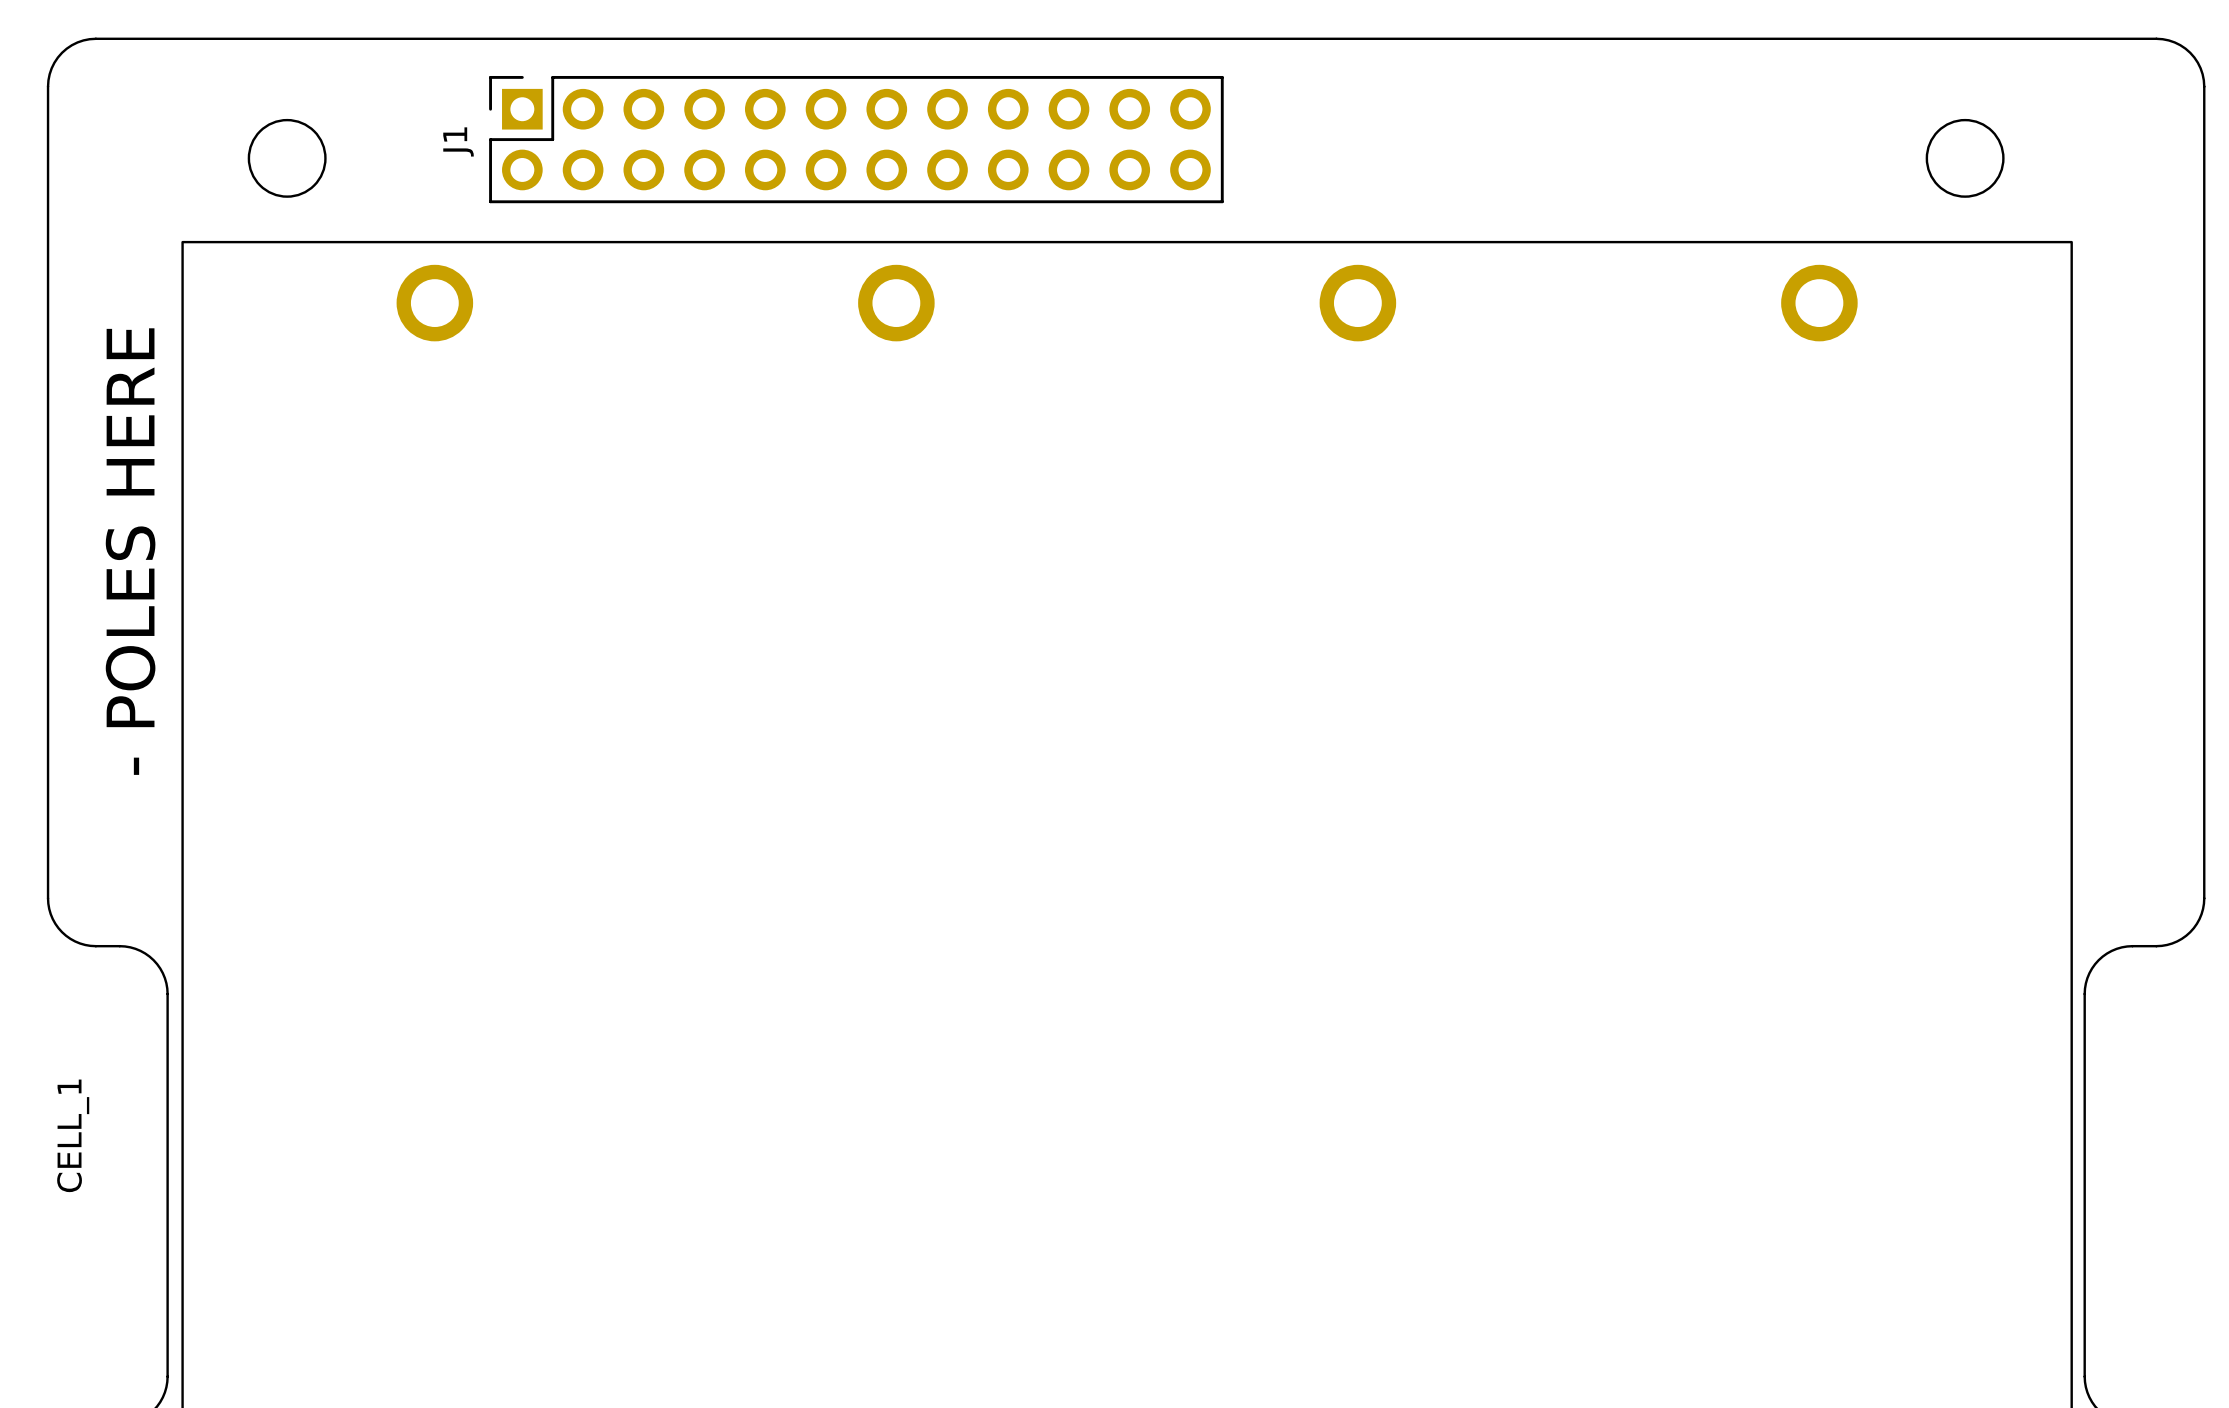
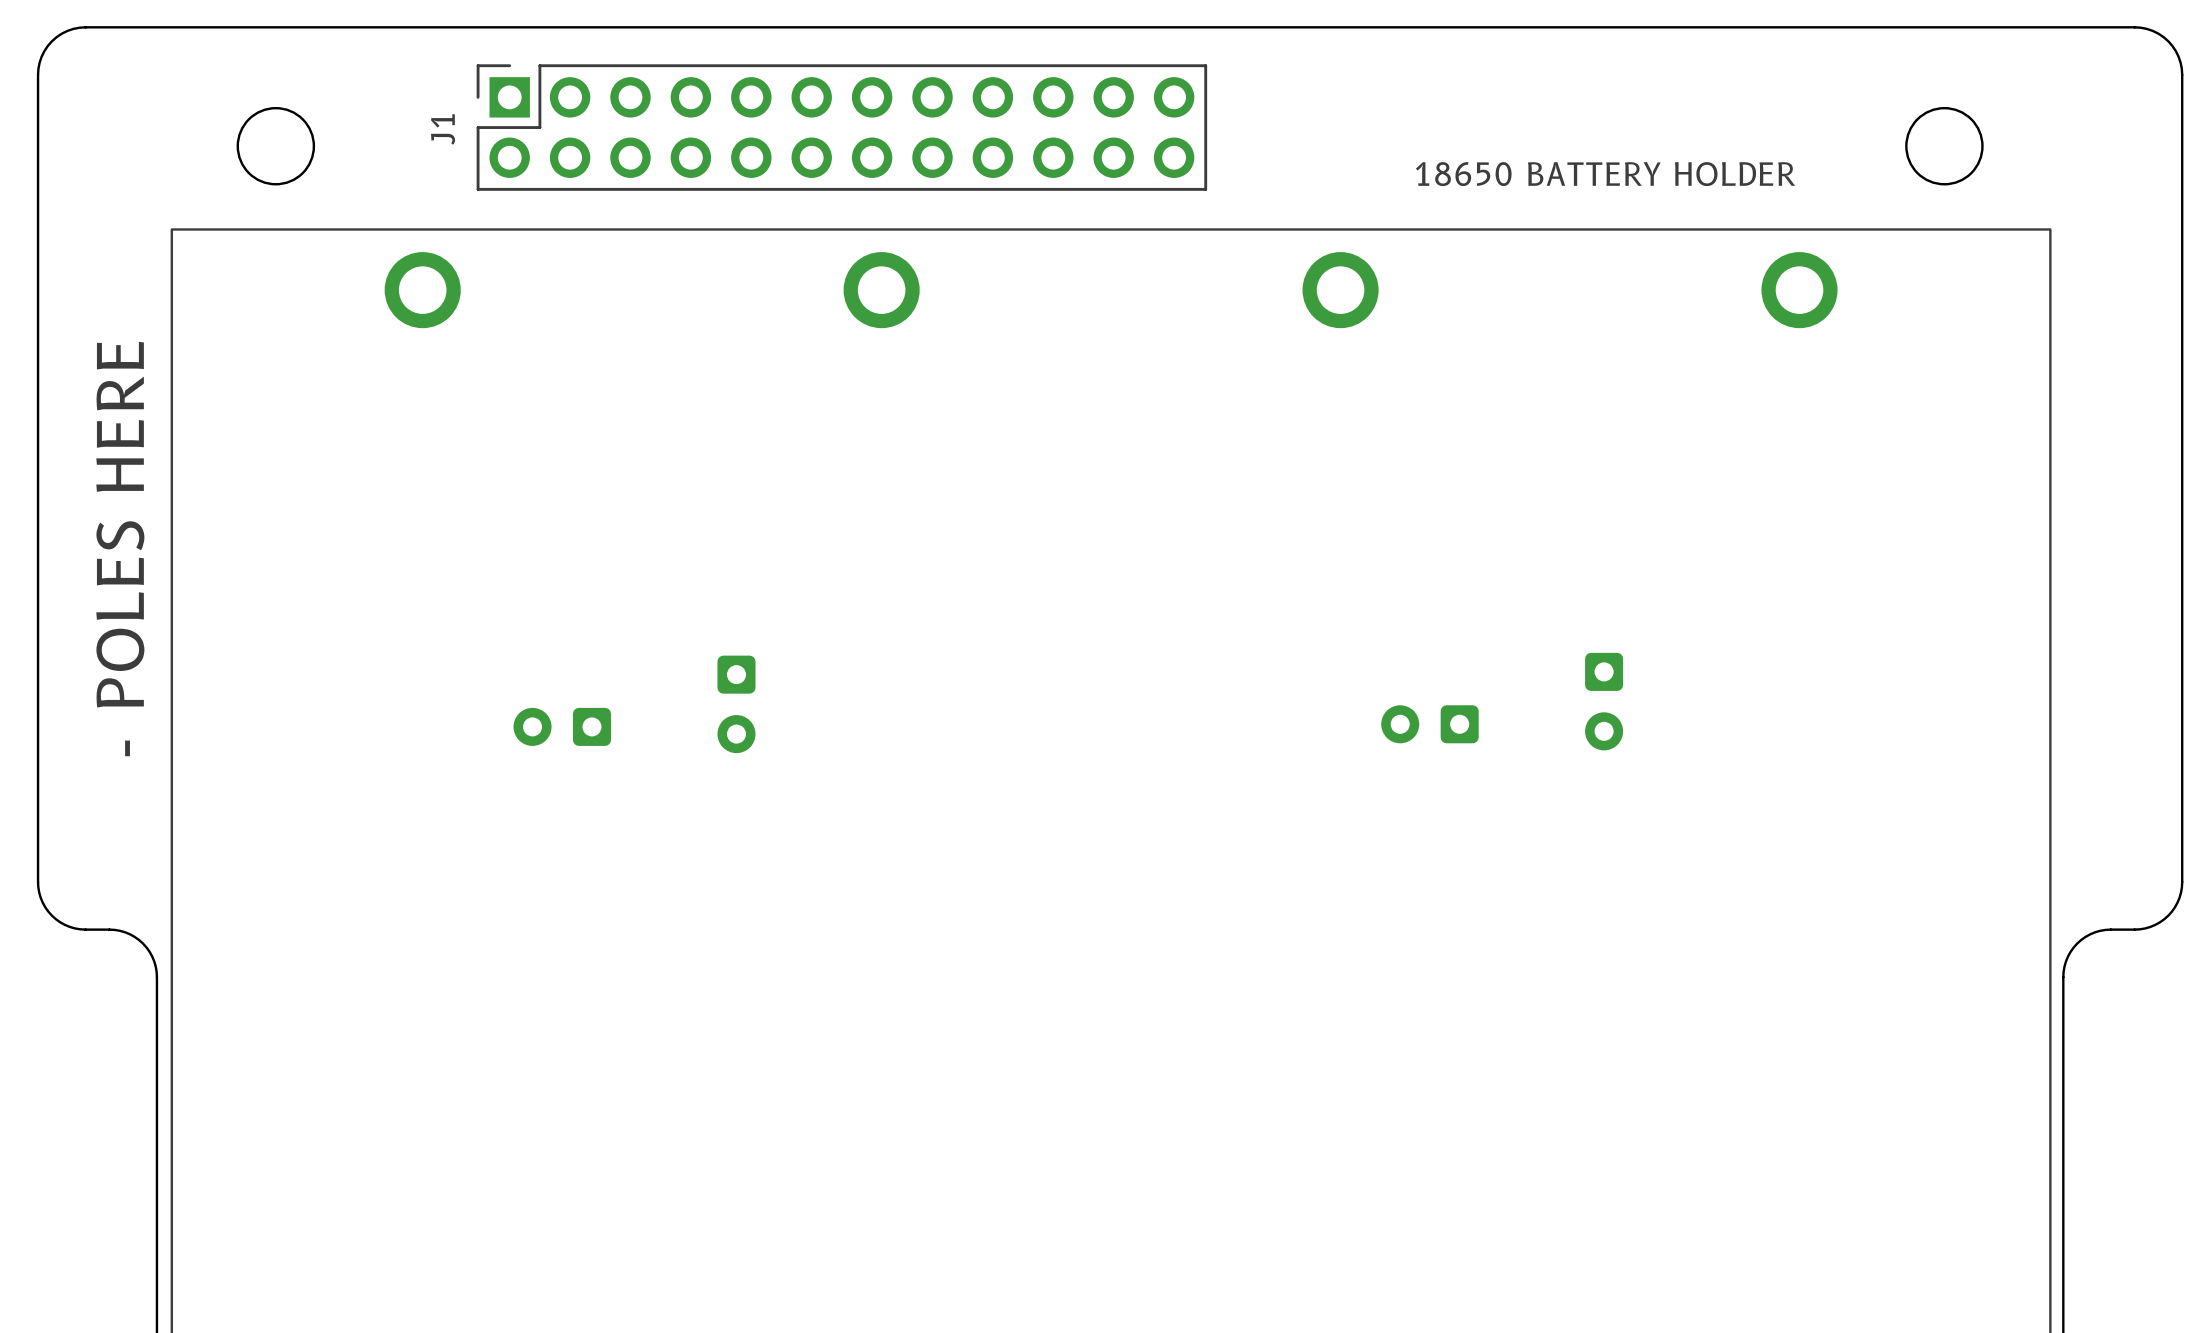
part: none -> (1604, 701)
part: none -> (736, 704)
part: none -> (1429, 724)
part: none -> (562, 726)
CELL_1 name: CELL_1 (73, 1135) -> 18650 BATTERY HOLDER (1605, 174)

